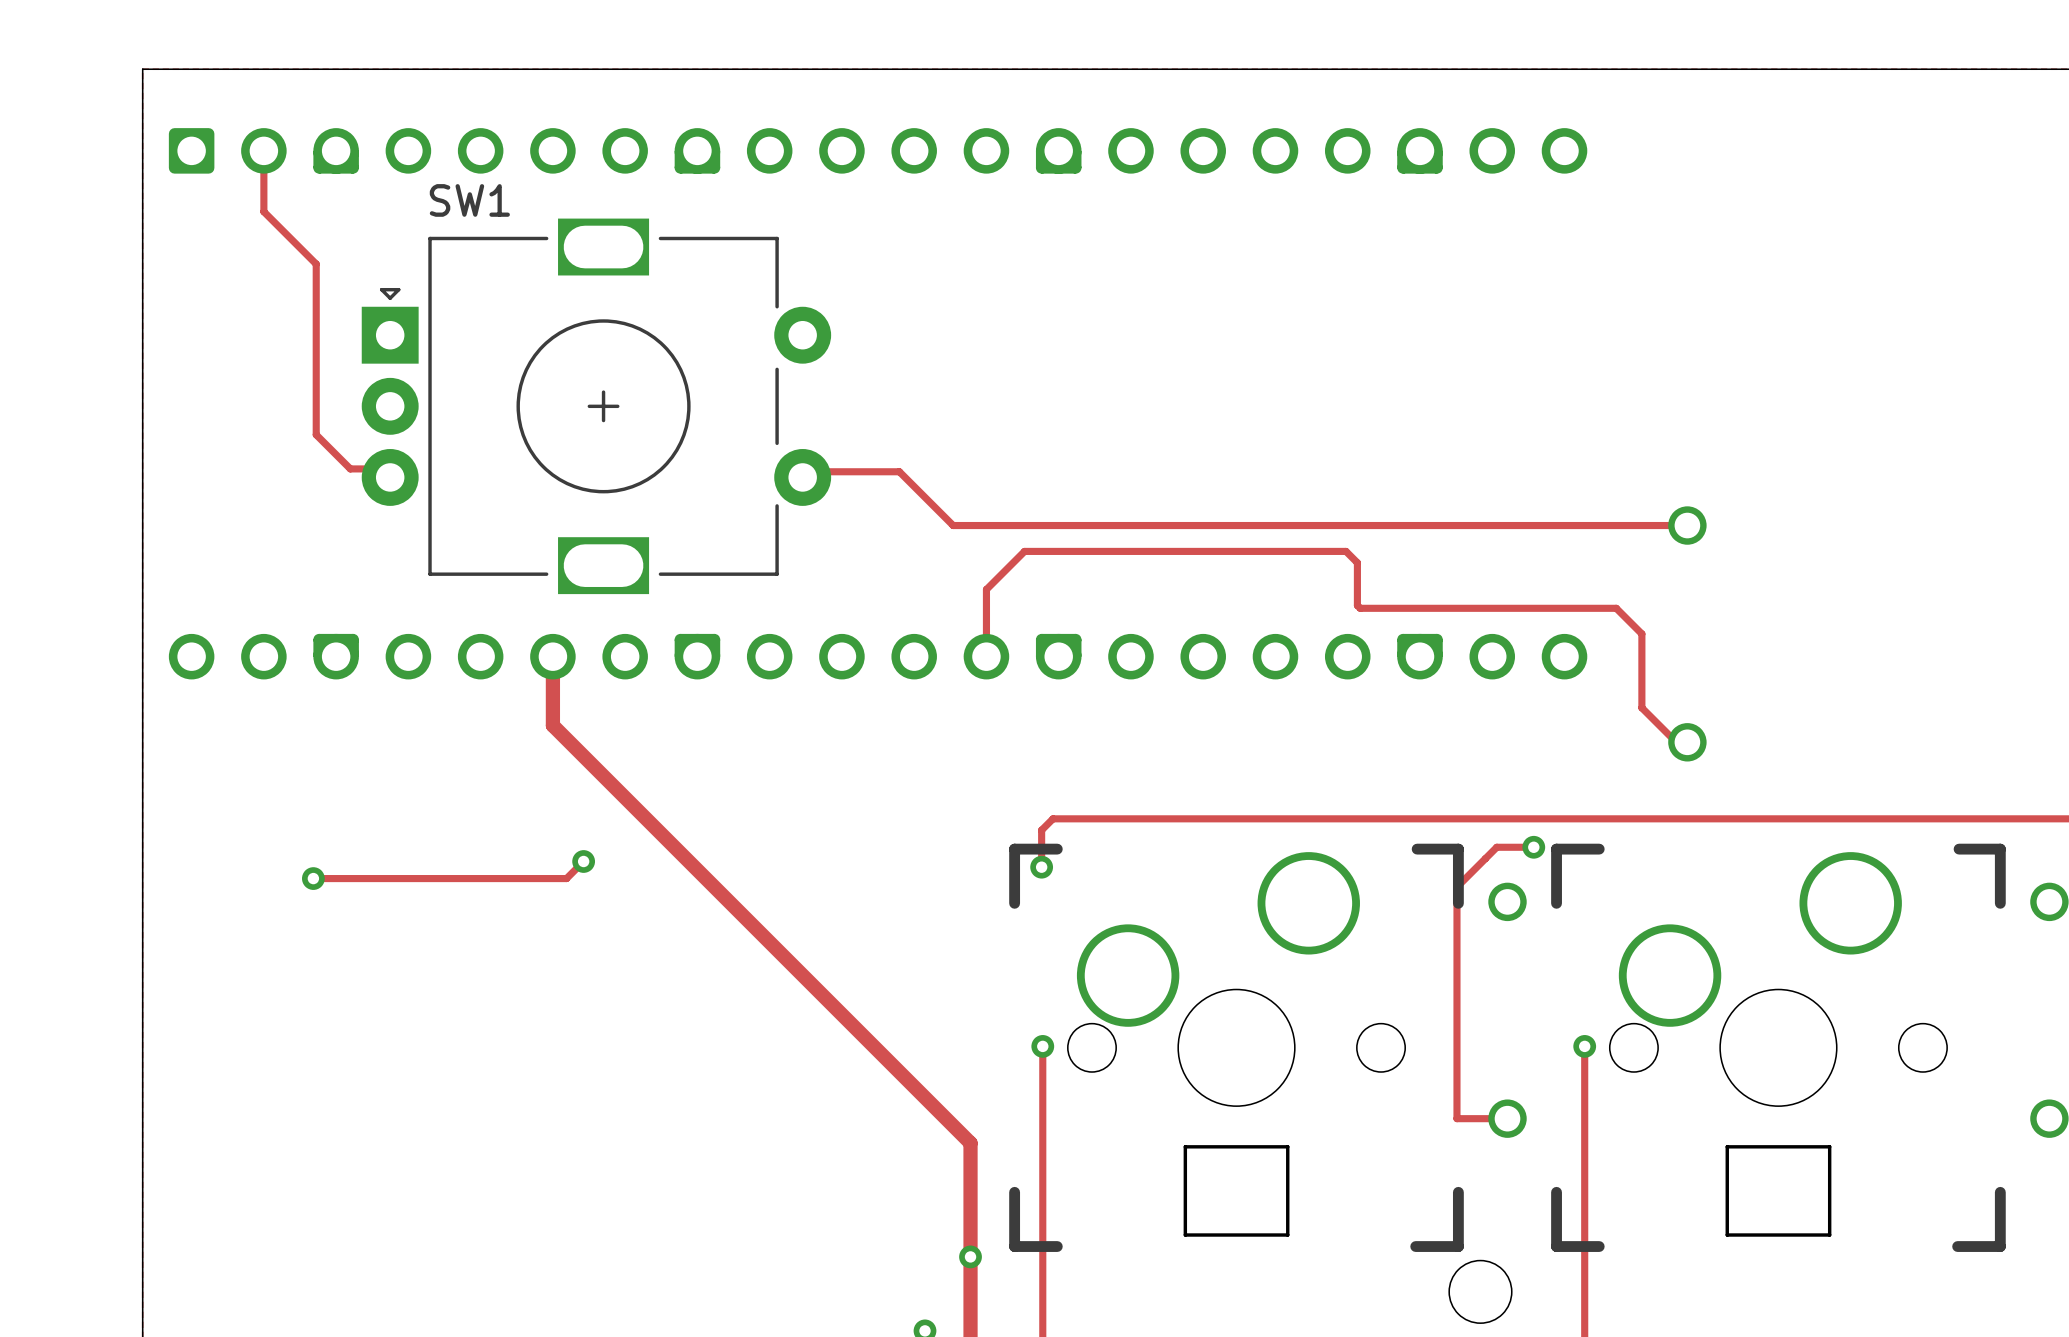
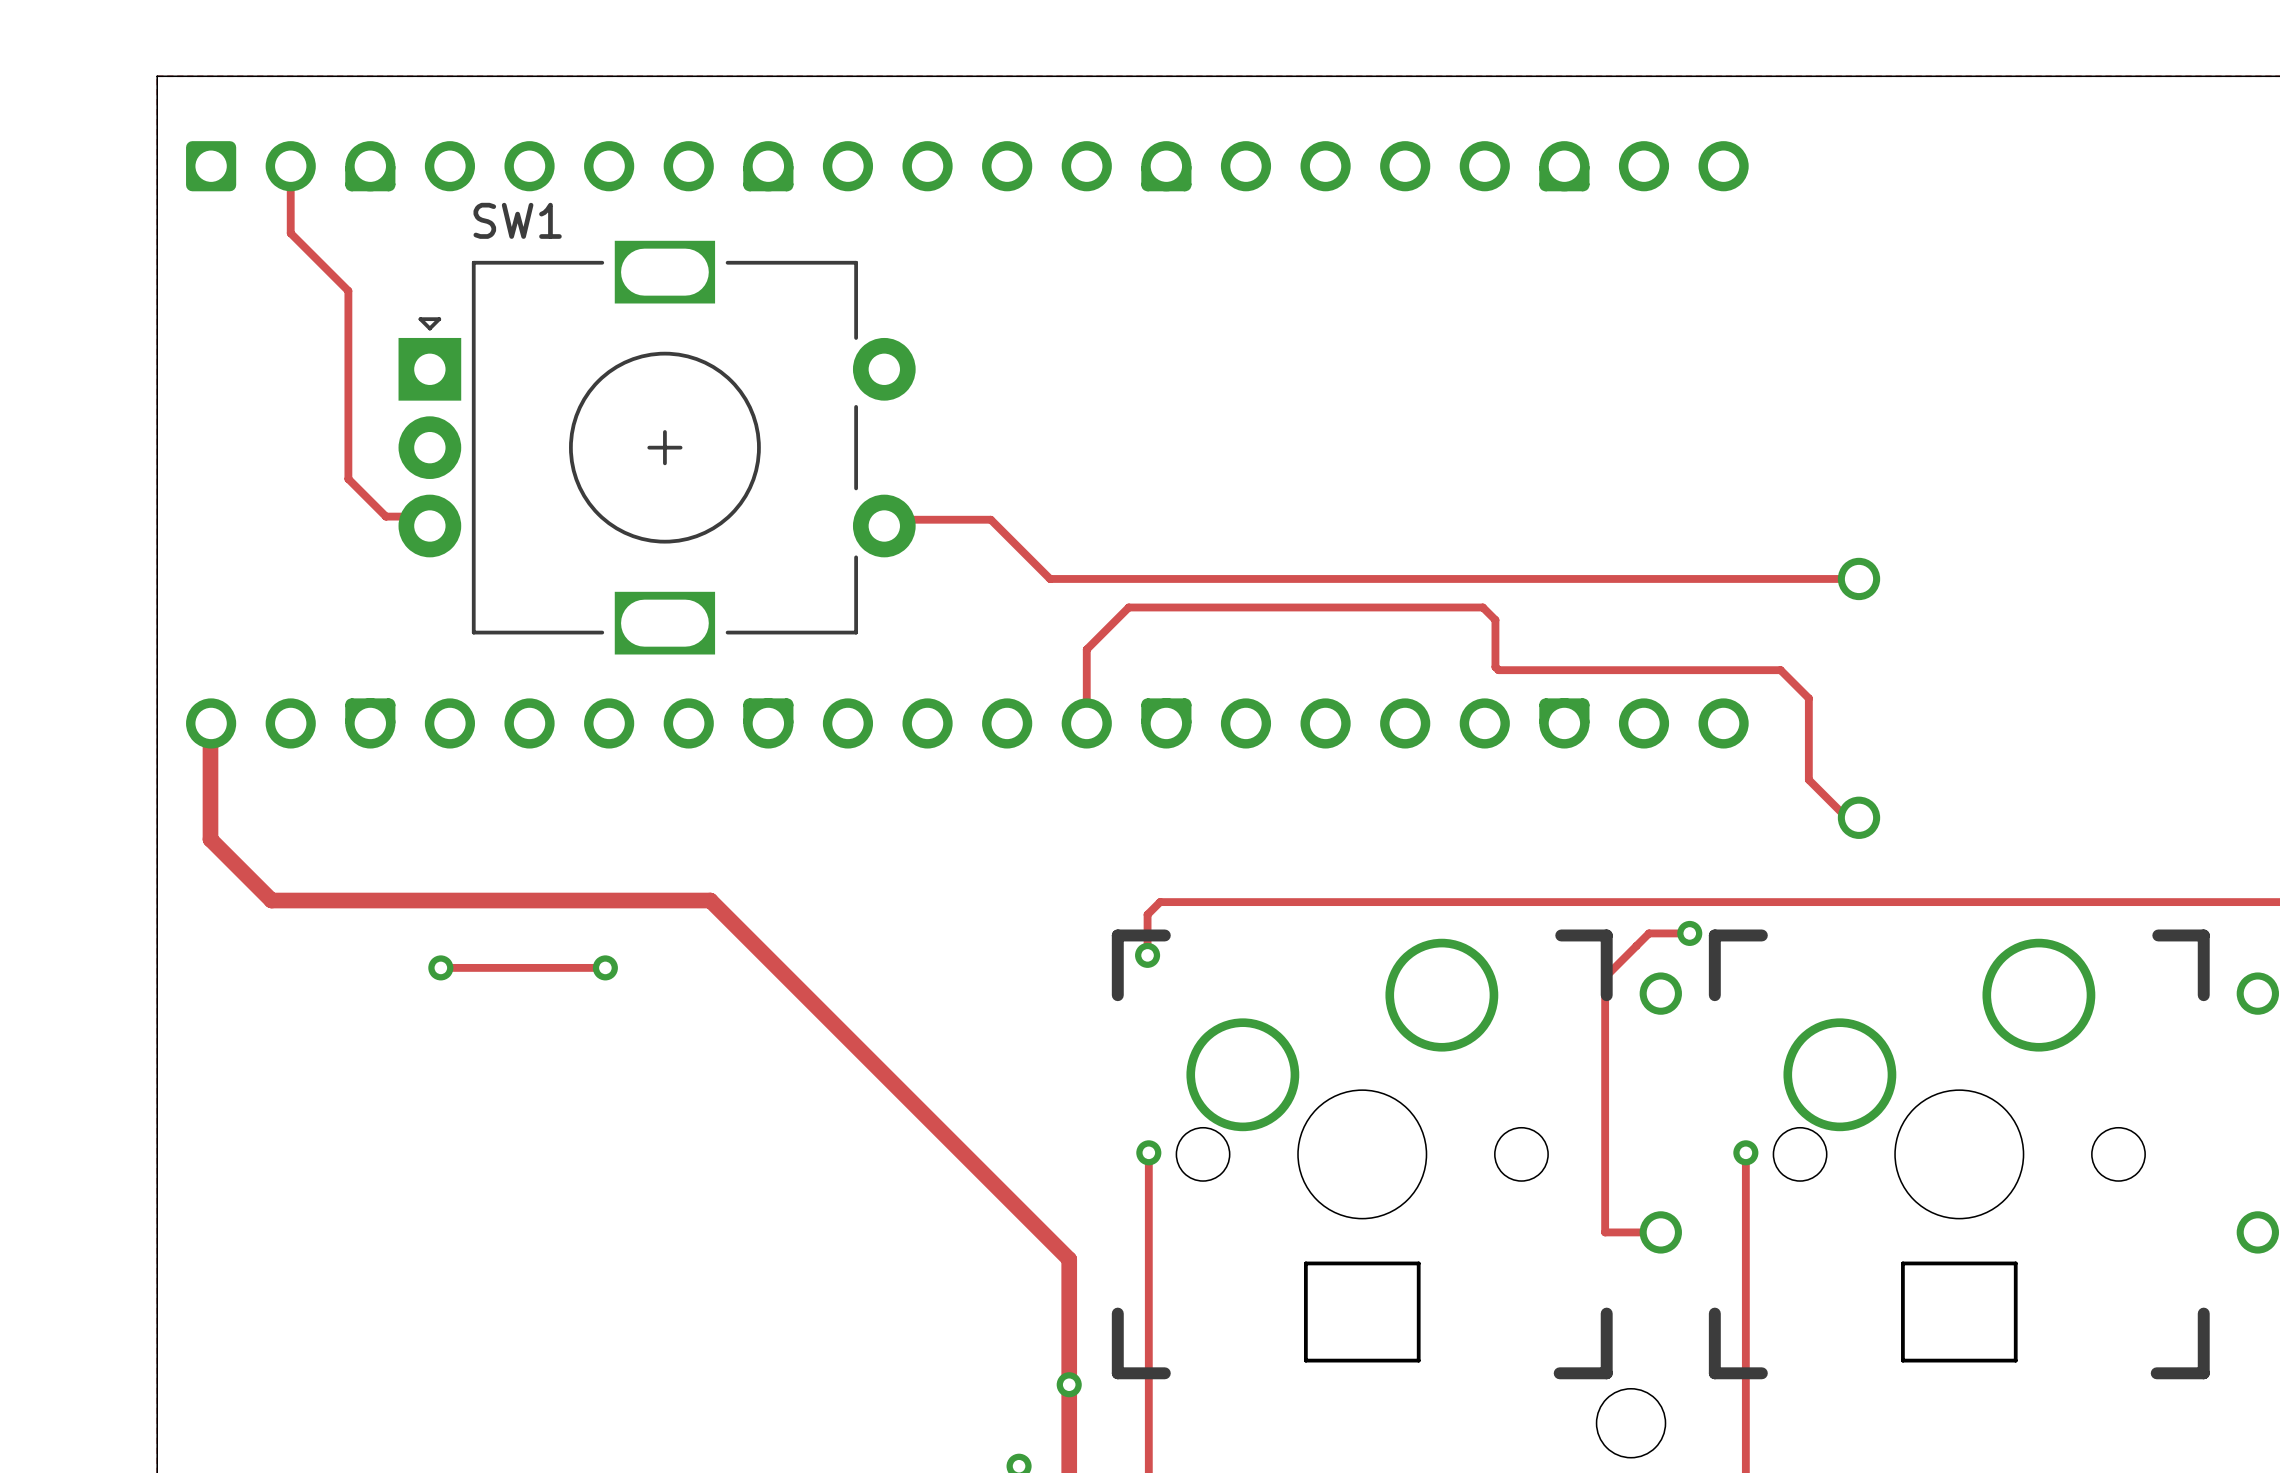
track: (552, 656) (552, 725) (644, 817) -> (211, 723) (210, 839) (271, 900) (710, 900)
track: (583, 861) (566, 878) (549, 878) -> none
via position: (583, 861) -> (605, 967)
track: (313, 878) (400, 878) -> none
via position: (313, 878) -> (440, 967)

